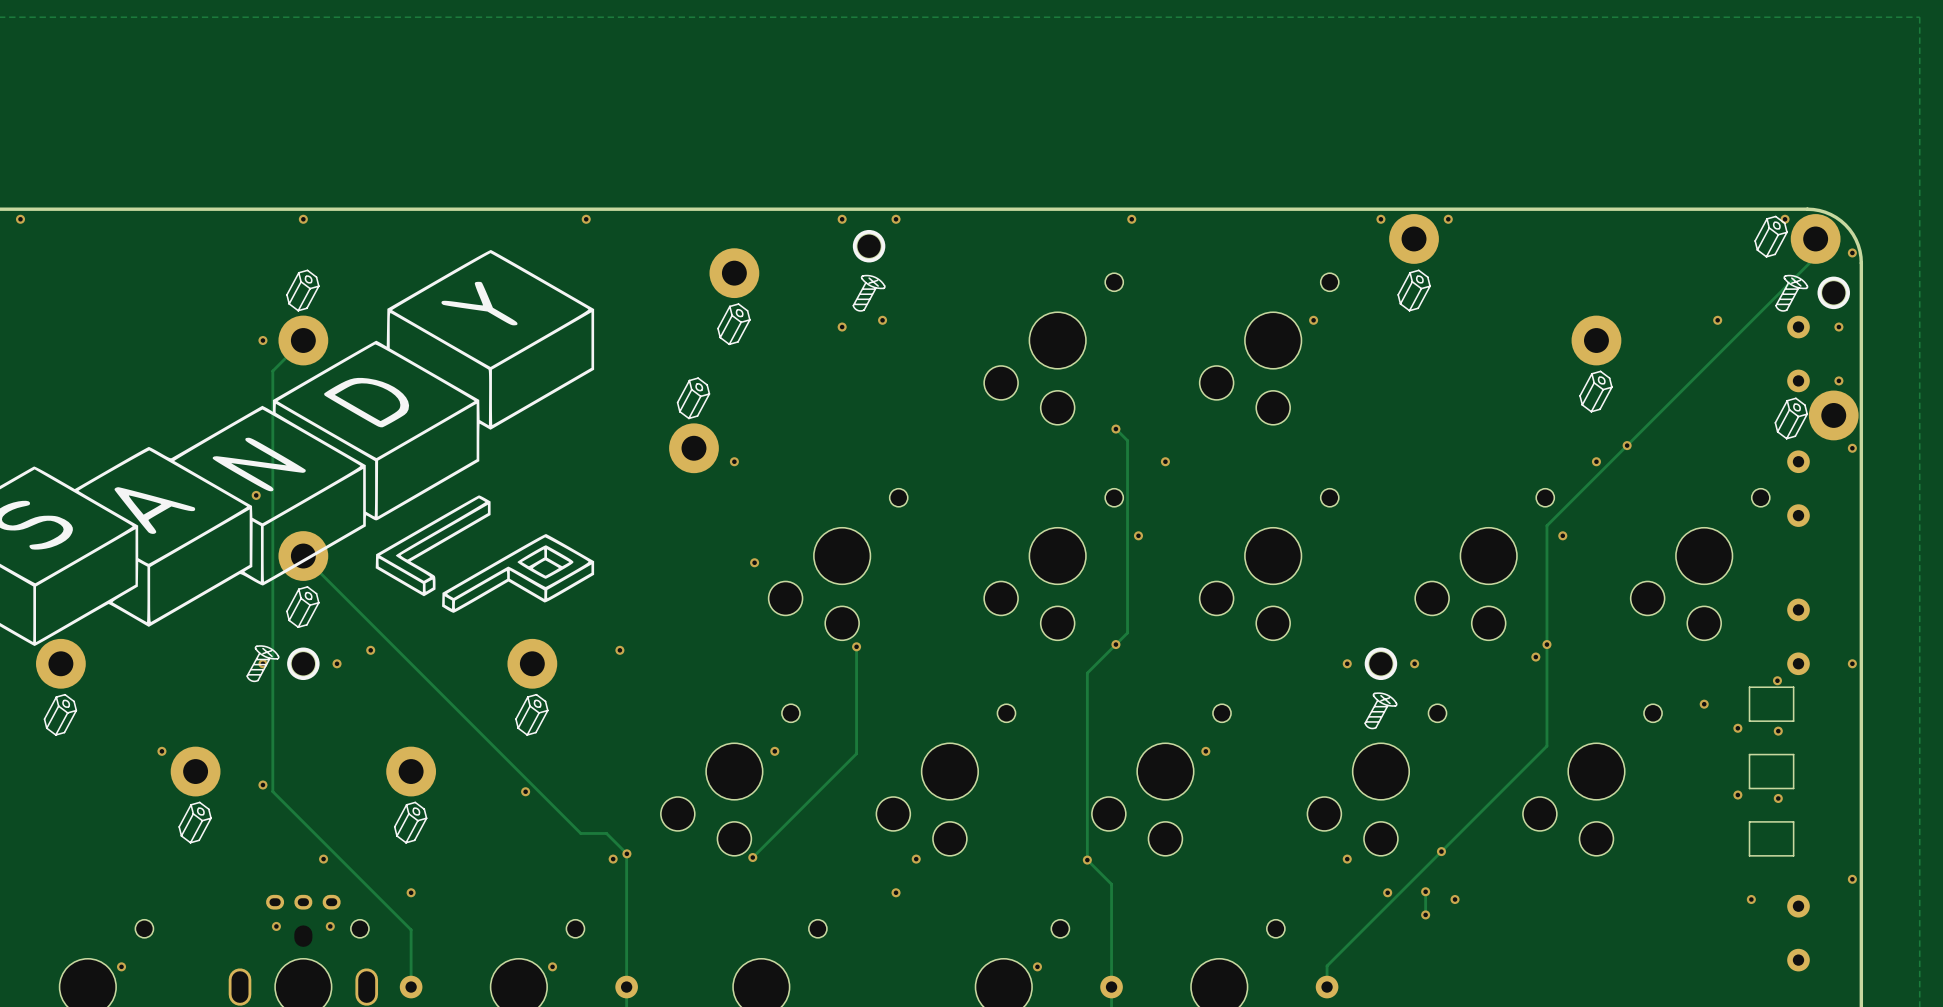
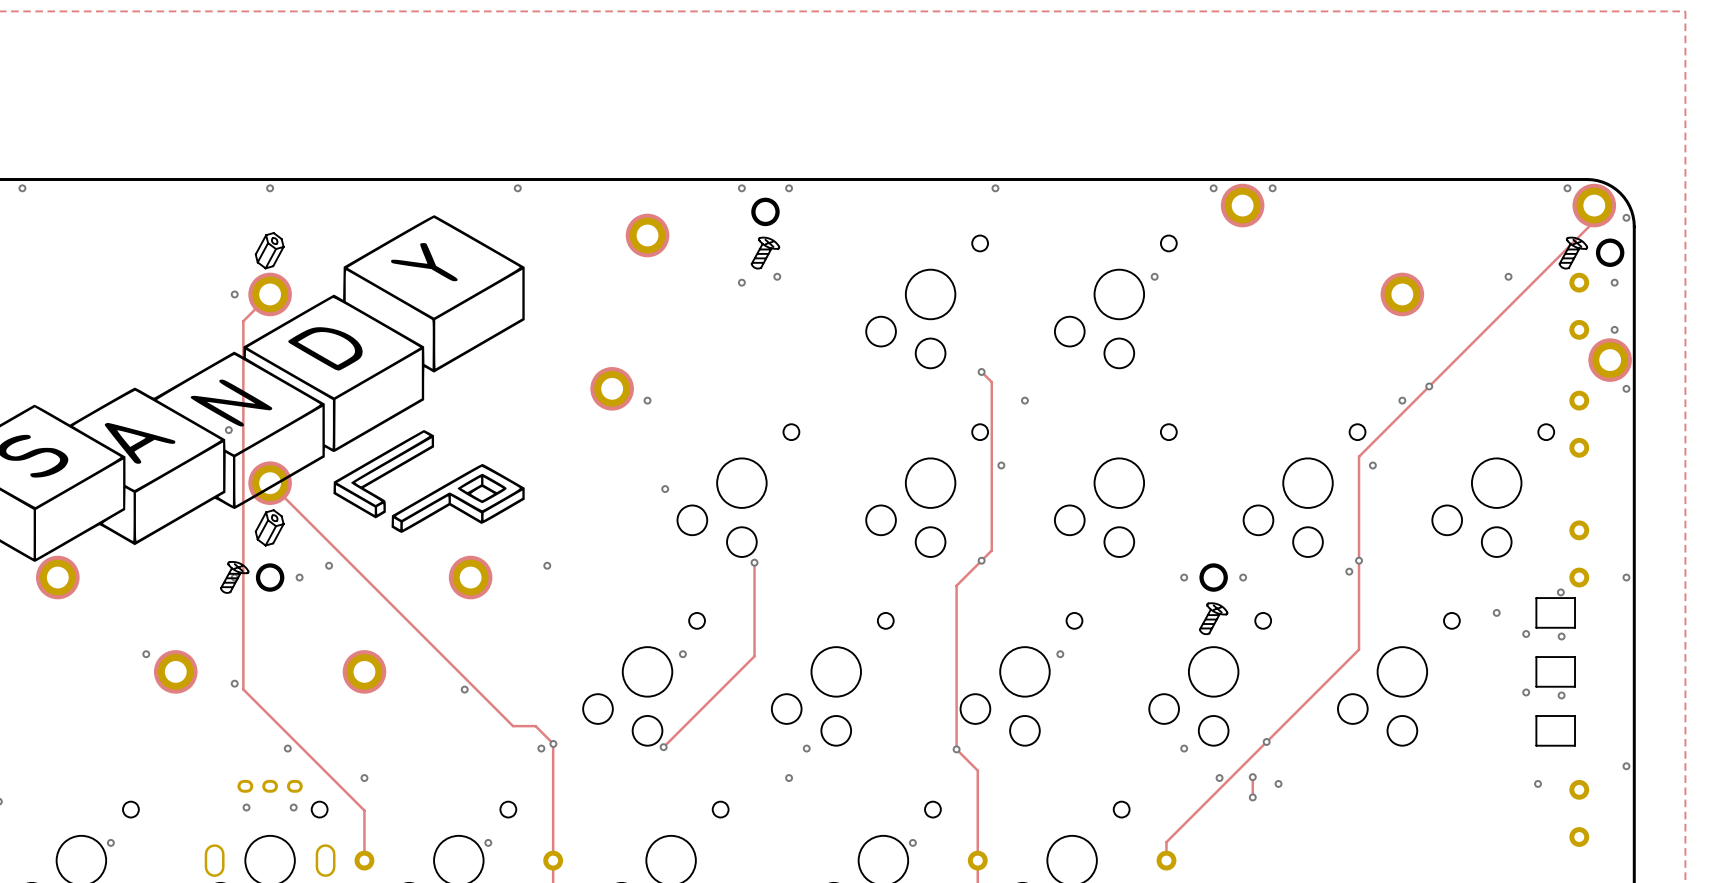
drawing: [1754, 215, 1788, 258] -> none
drawing: [1397, 269, 1431, 312] -> none
drawing: [717, 303, 751, 346] -> none
drawing: [1579, 370, 1613, 413] -> none
drawing: [676, 377, 711, 420] -> none
drawing: [1774, 397, 1808, 440] -> none
drawing: [43, 693, 78, 736] -> none
drawing: [515, 693, 549, 736] -> none
drawing: [178, 801, 212, 844] -> none
drawing: [394, 801, 428, 844] -> none

